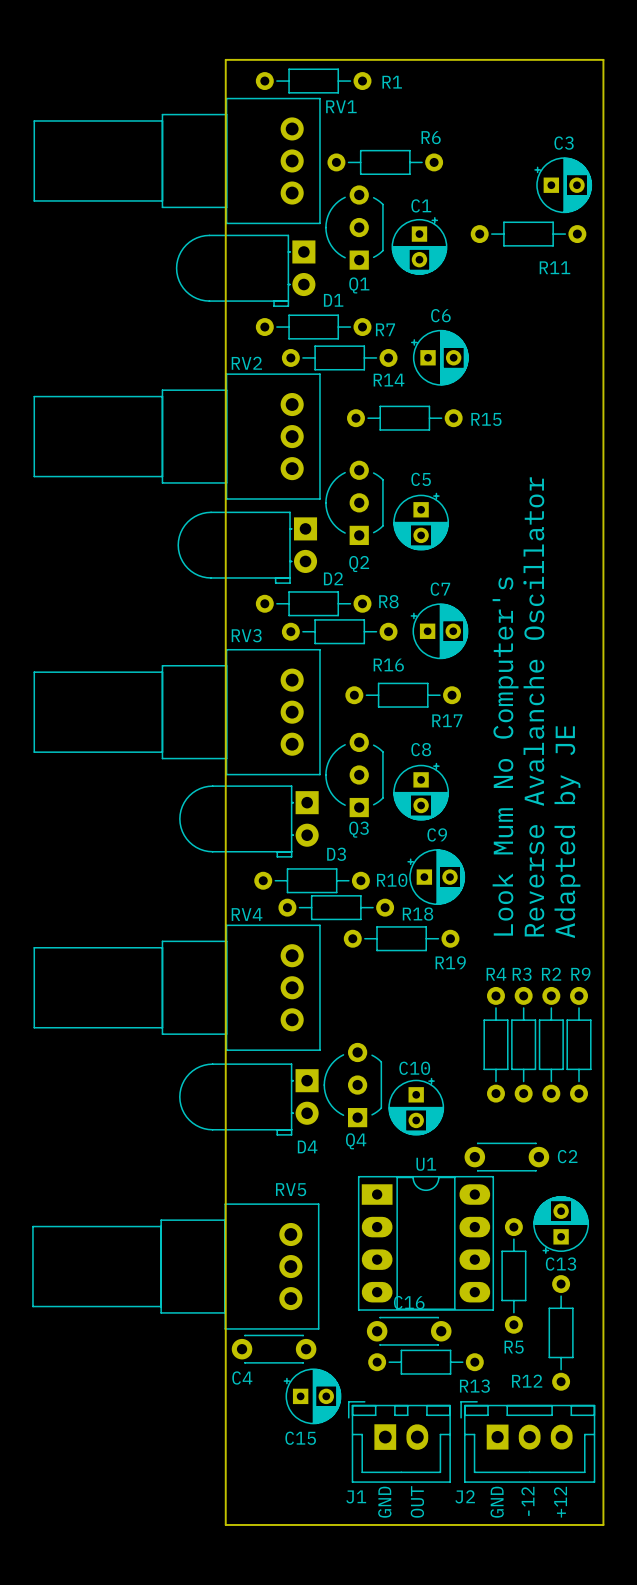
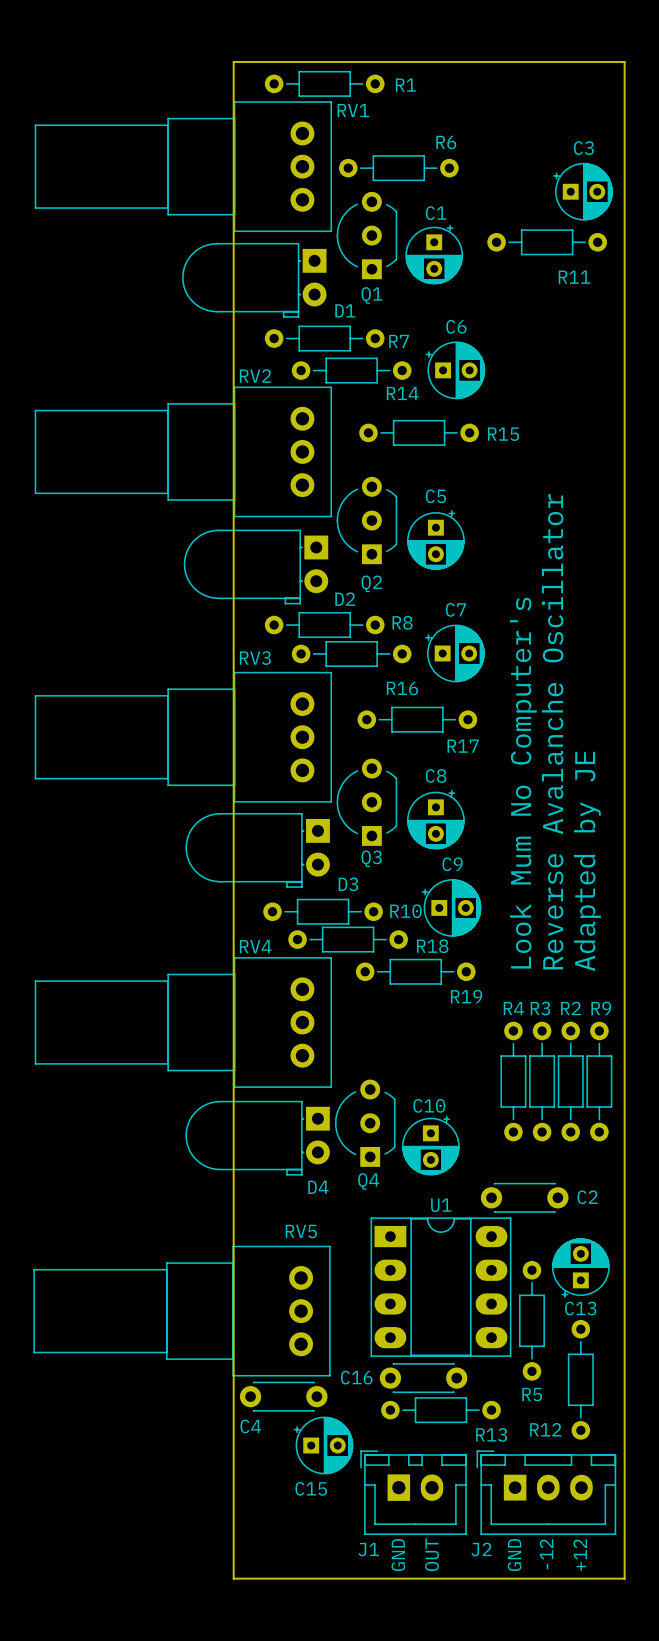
C16 name position: C16 (409, 1302) -> C16 (356, 1377)

